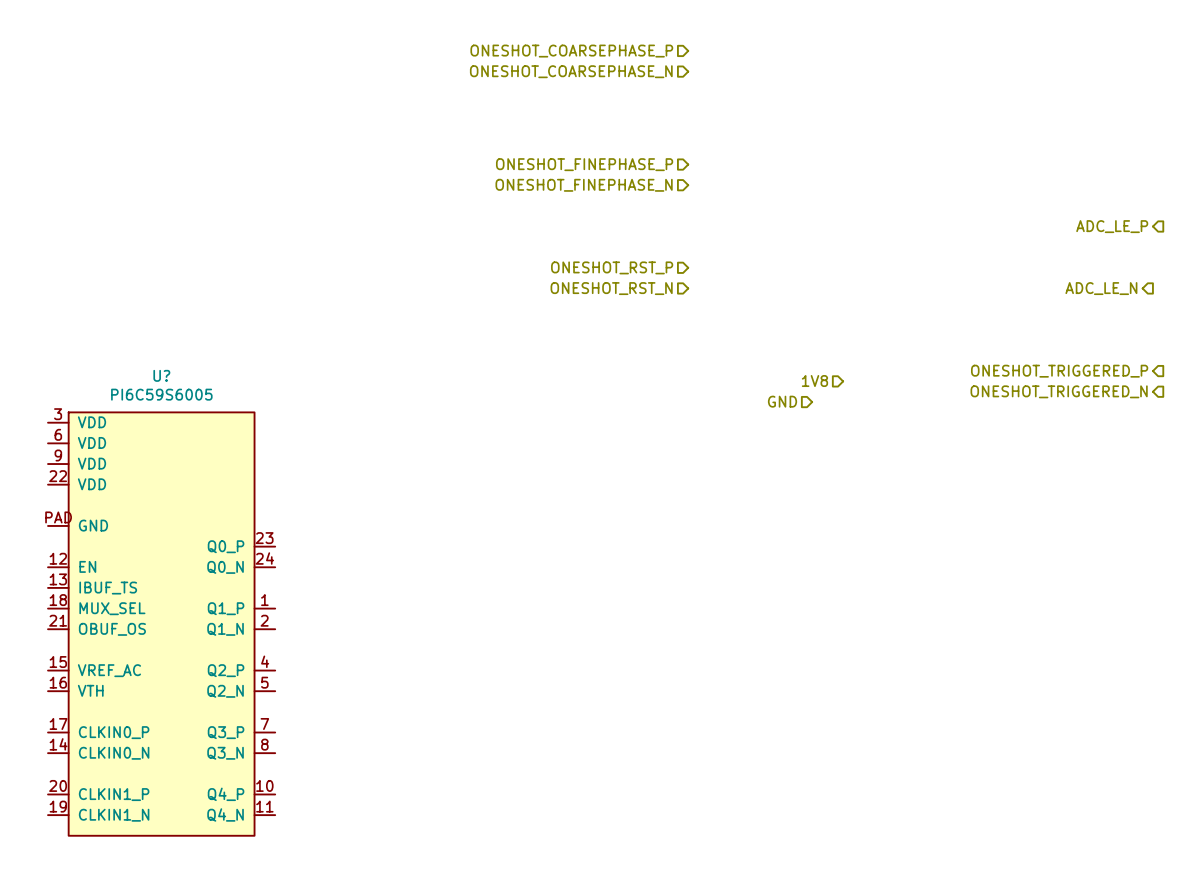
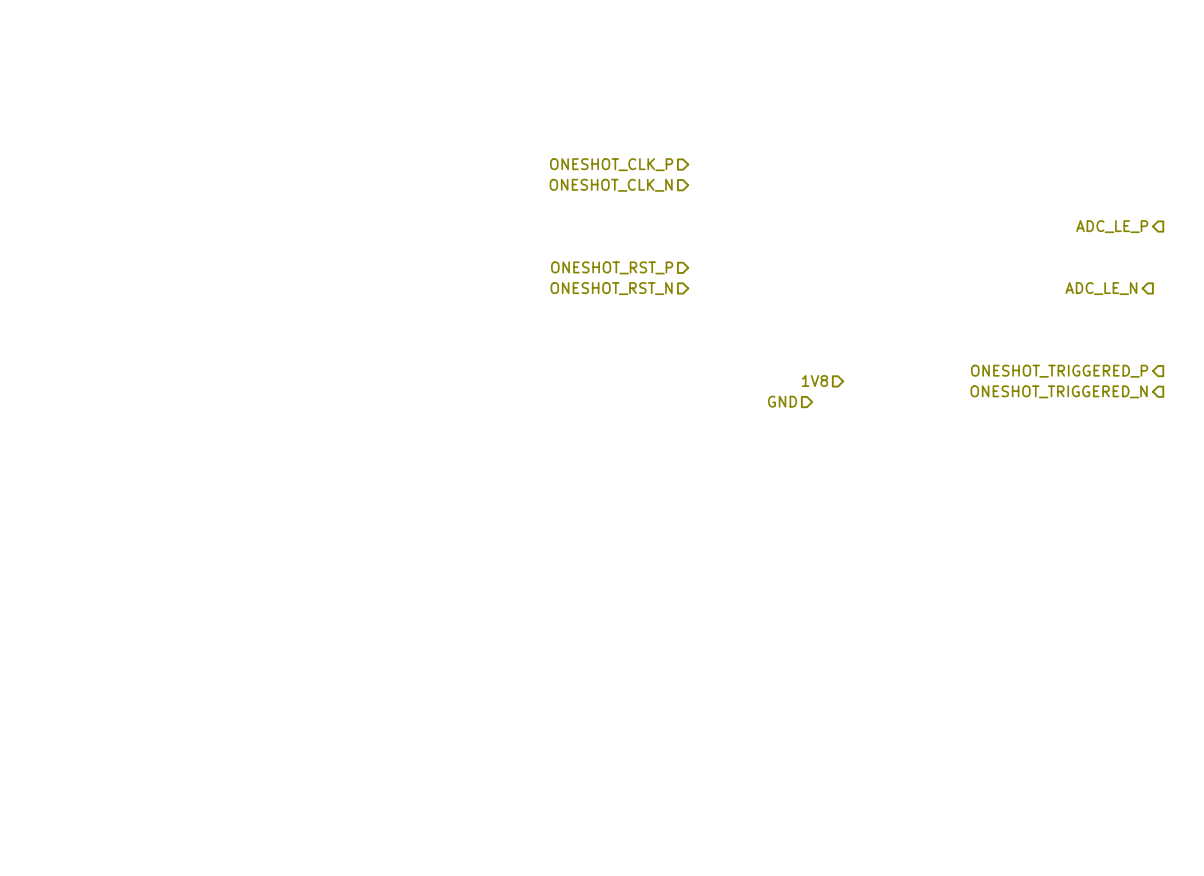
hierarchical label: ONESHOT_COARSEPHASE_P (571, 51) -> none
hierarchical label: ONESHOT_COARSEPHASE_N (571, 71) -> none
hierarchical label: ONESHOT_FINEPHASE_P (584, 164) -> ONESHOT_CLK_P (611, 164)
hierarchical label: ONESHOT_FINEPHASE_N (584, 185) -> ONESHOT_CLK_N (611, 185)
U?: PI6C59S6005 (161, 624) -> none

